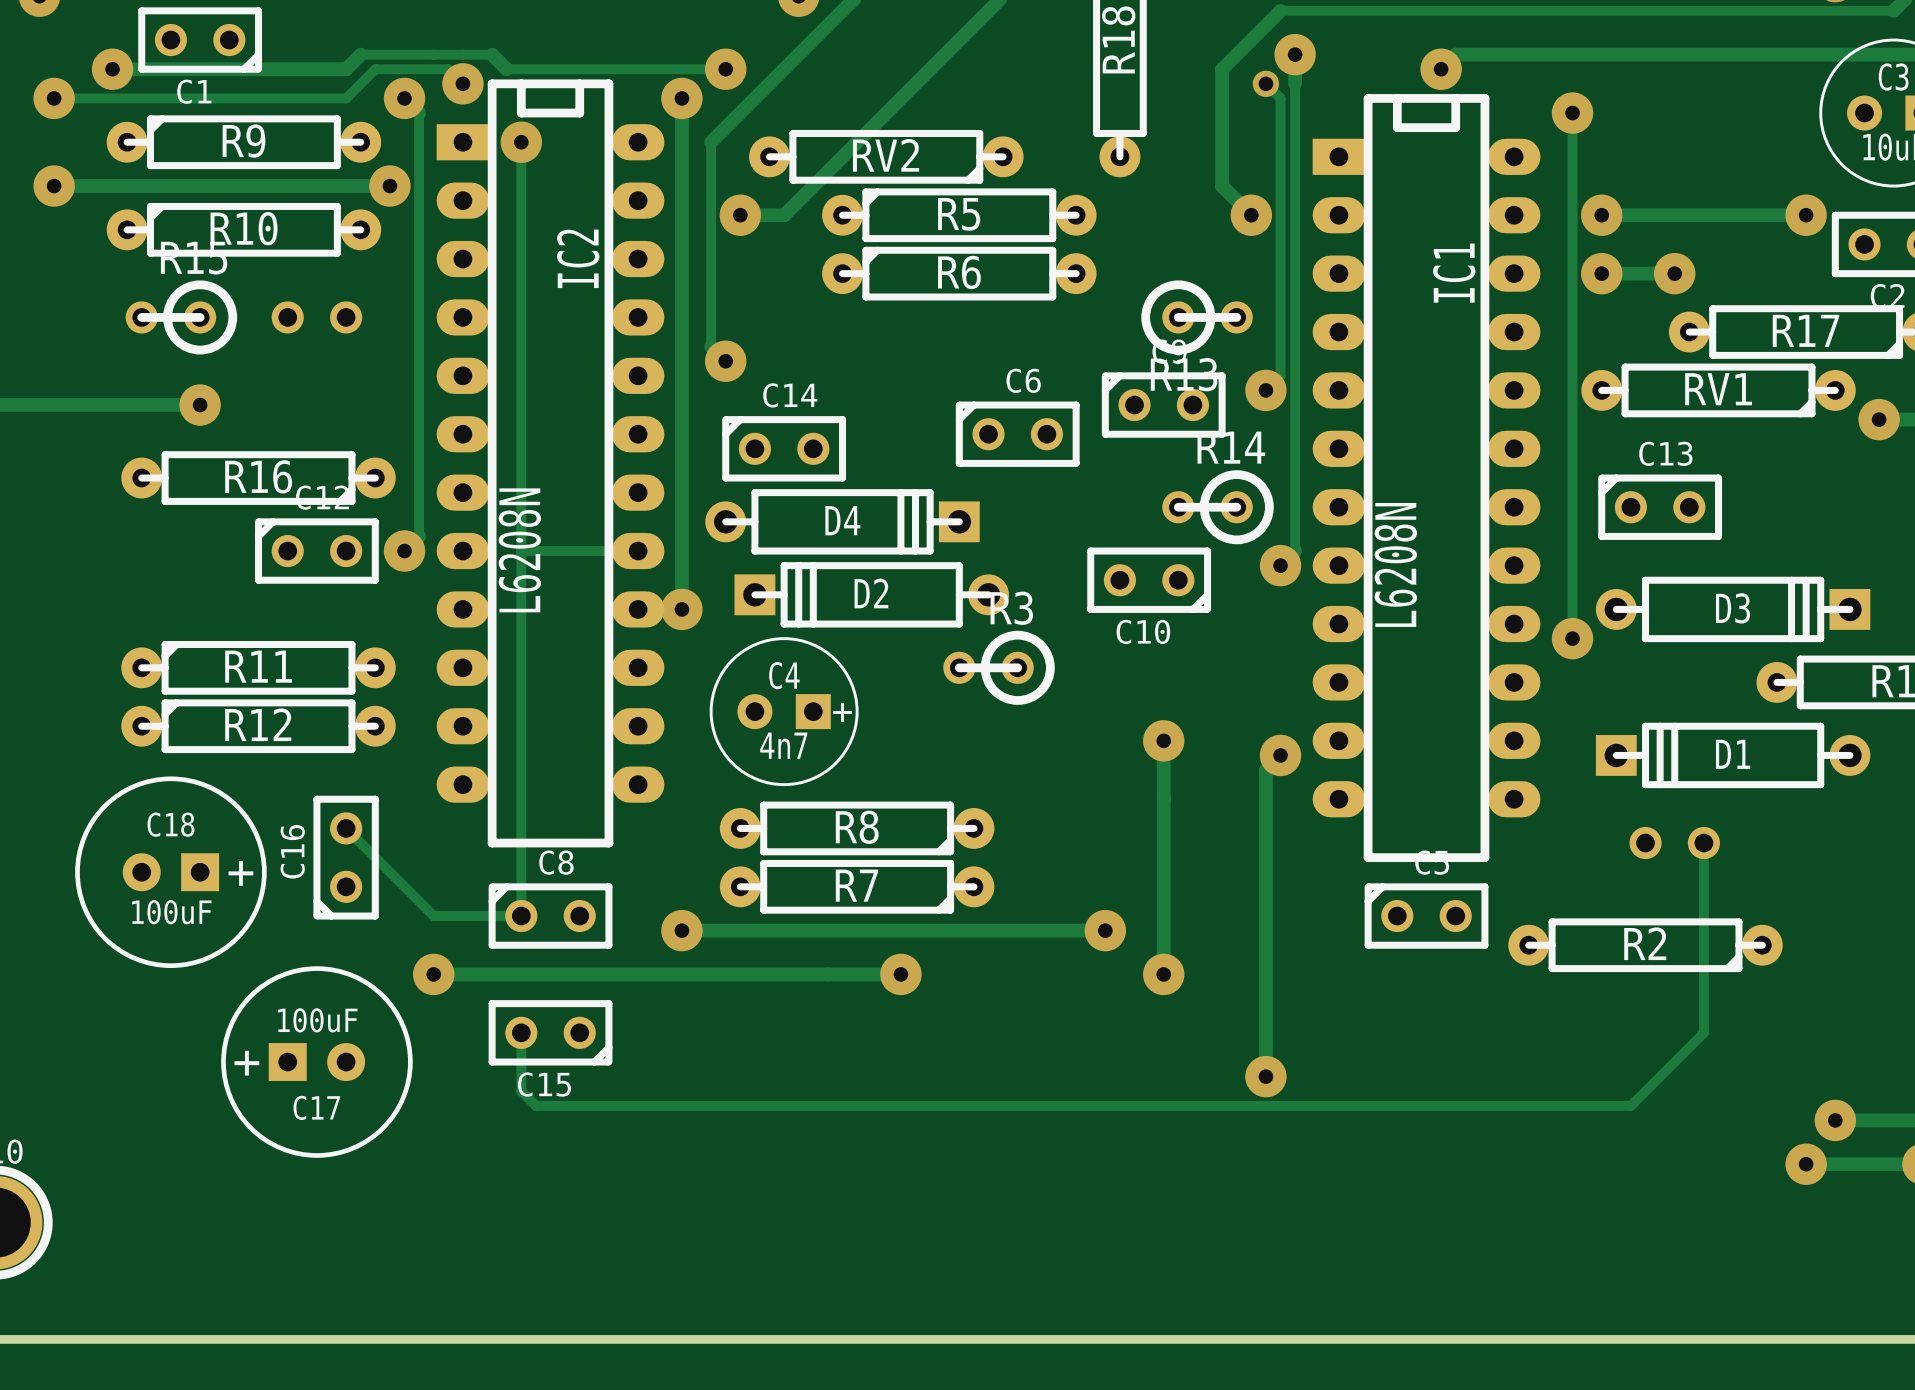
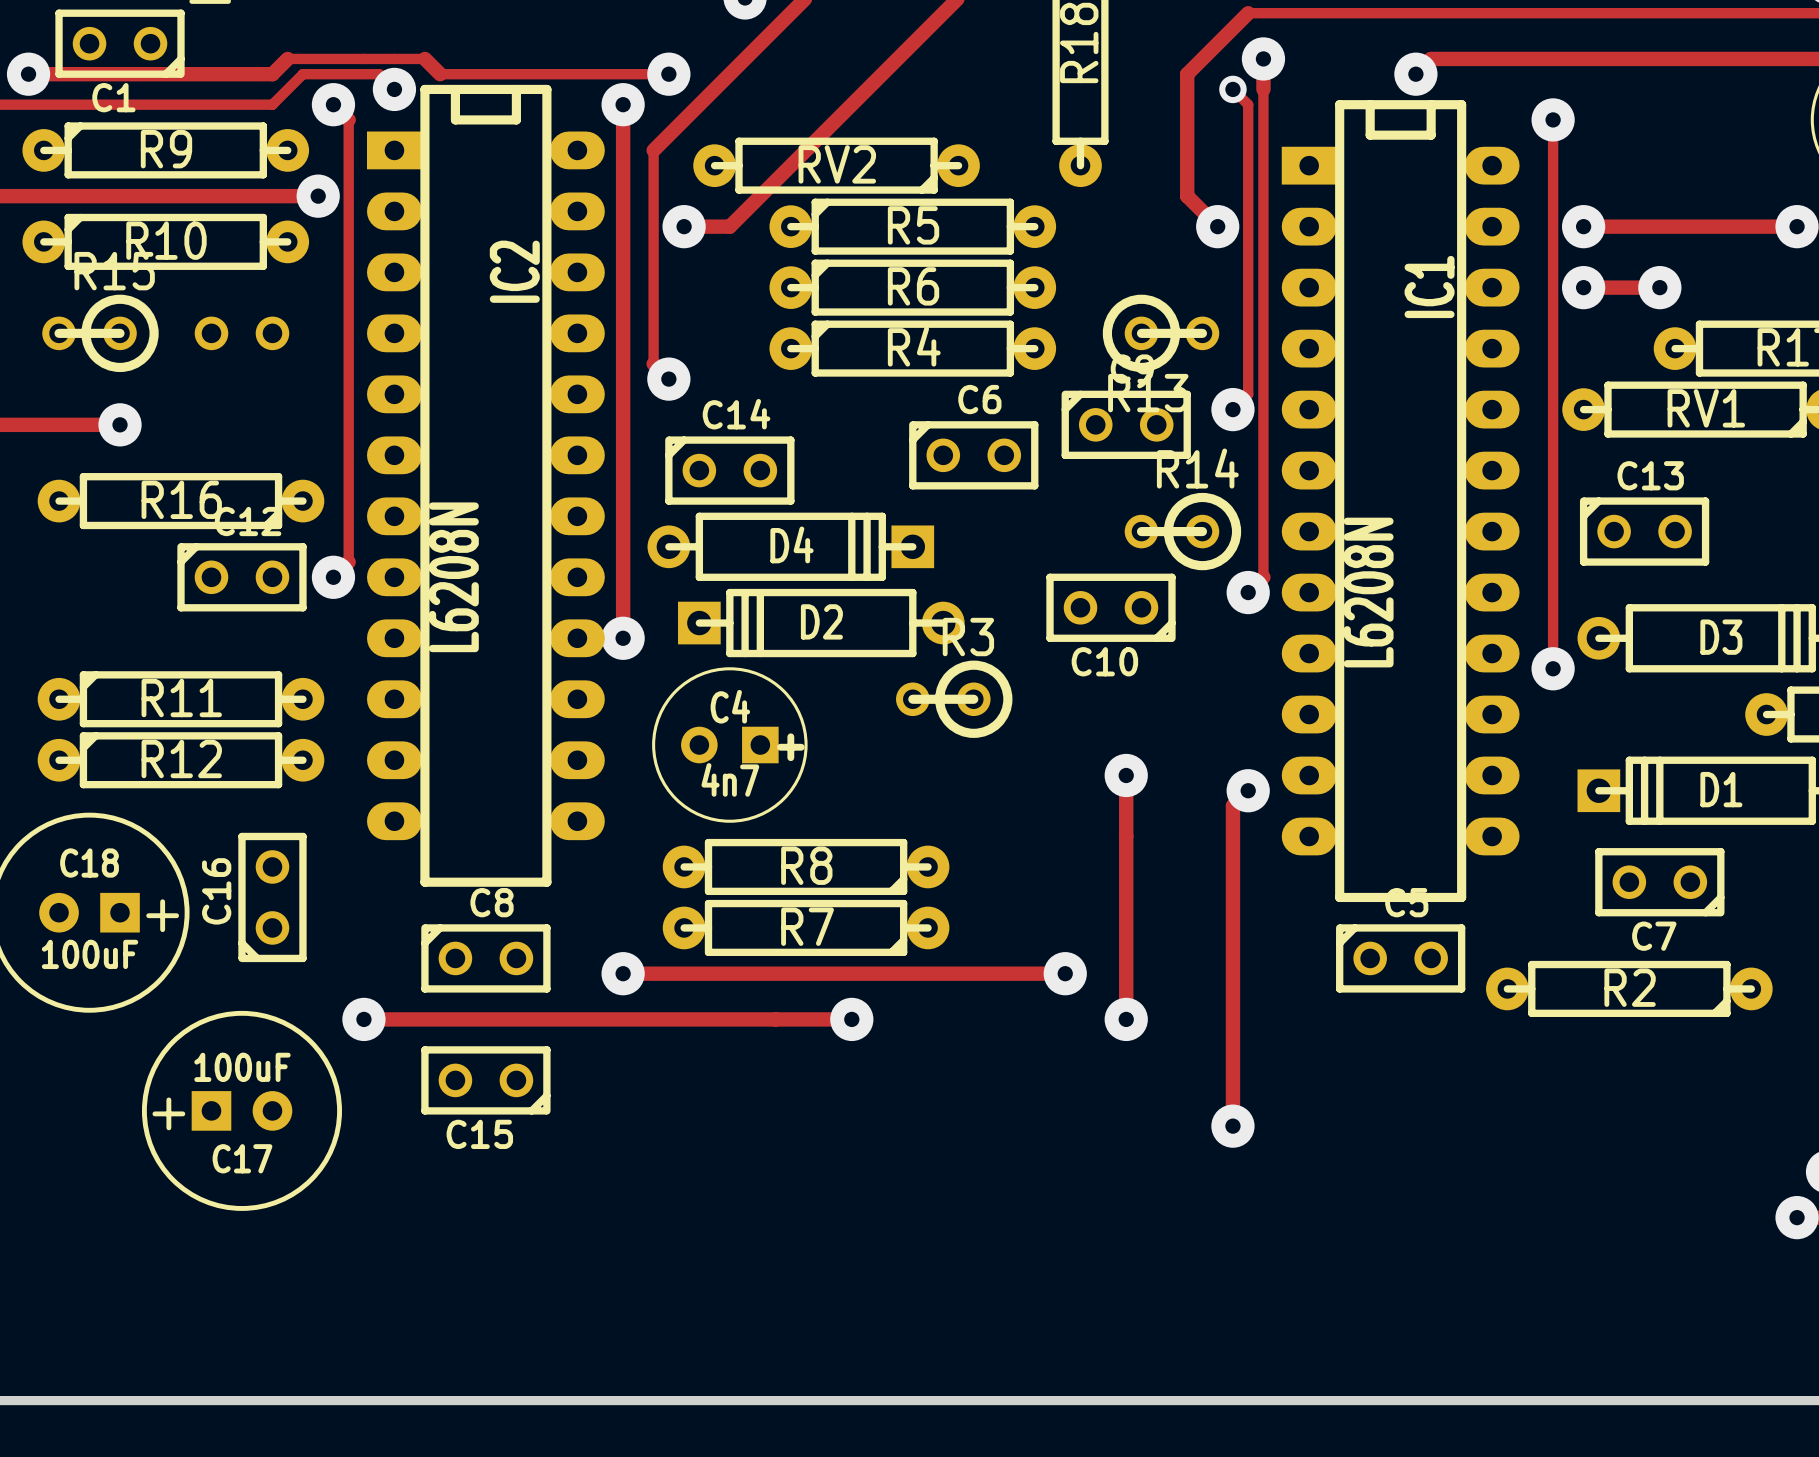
track: (521, 142) (521, 916) (433, 916) (346, 828) -> none
via: (521, 142) -> none
R4: none -> (912, 348)
track: (521, 551) (638, 551) -> none
C7 side: bottom (1674, 843) -> top (1659, 882)
track: (1703, 843) (1703, 1032) (1630, 1105) (535, 1105) (521, 1091) (521, 1032) -> none

